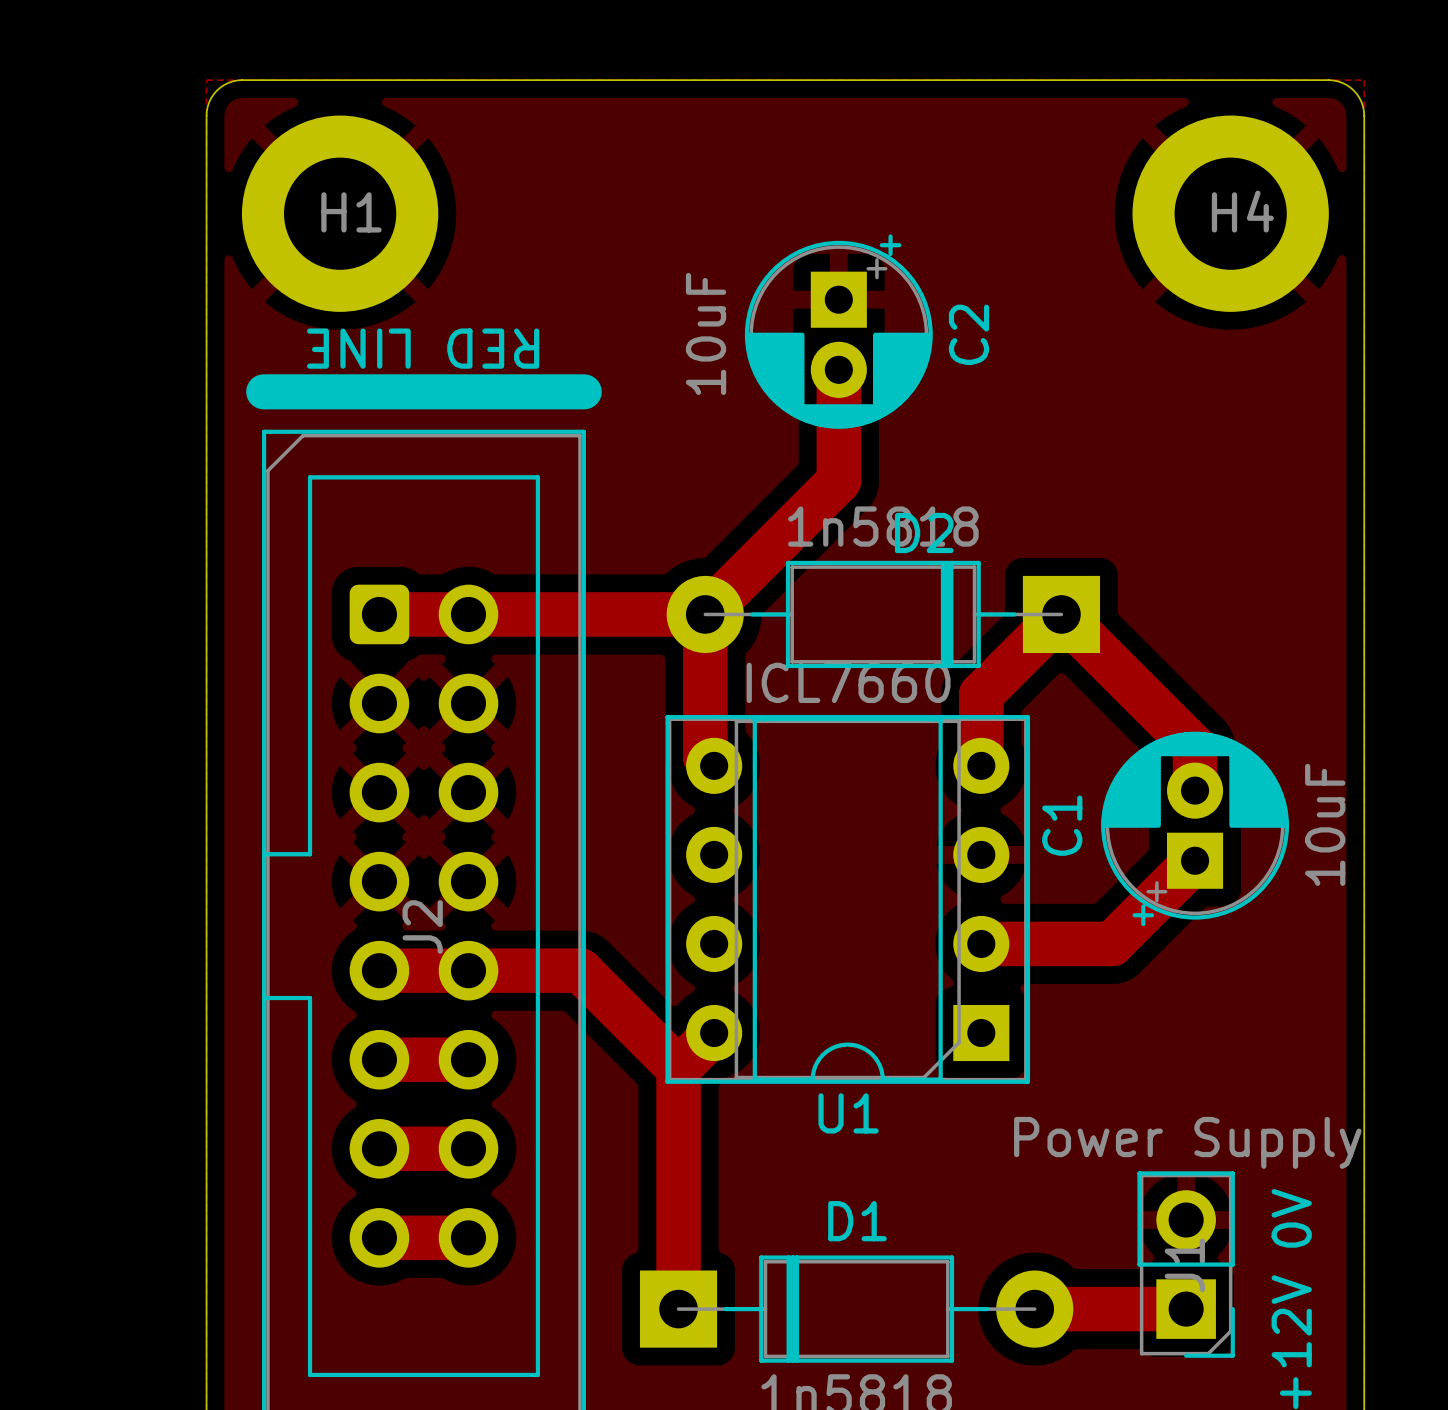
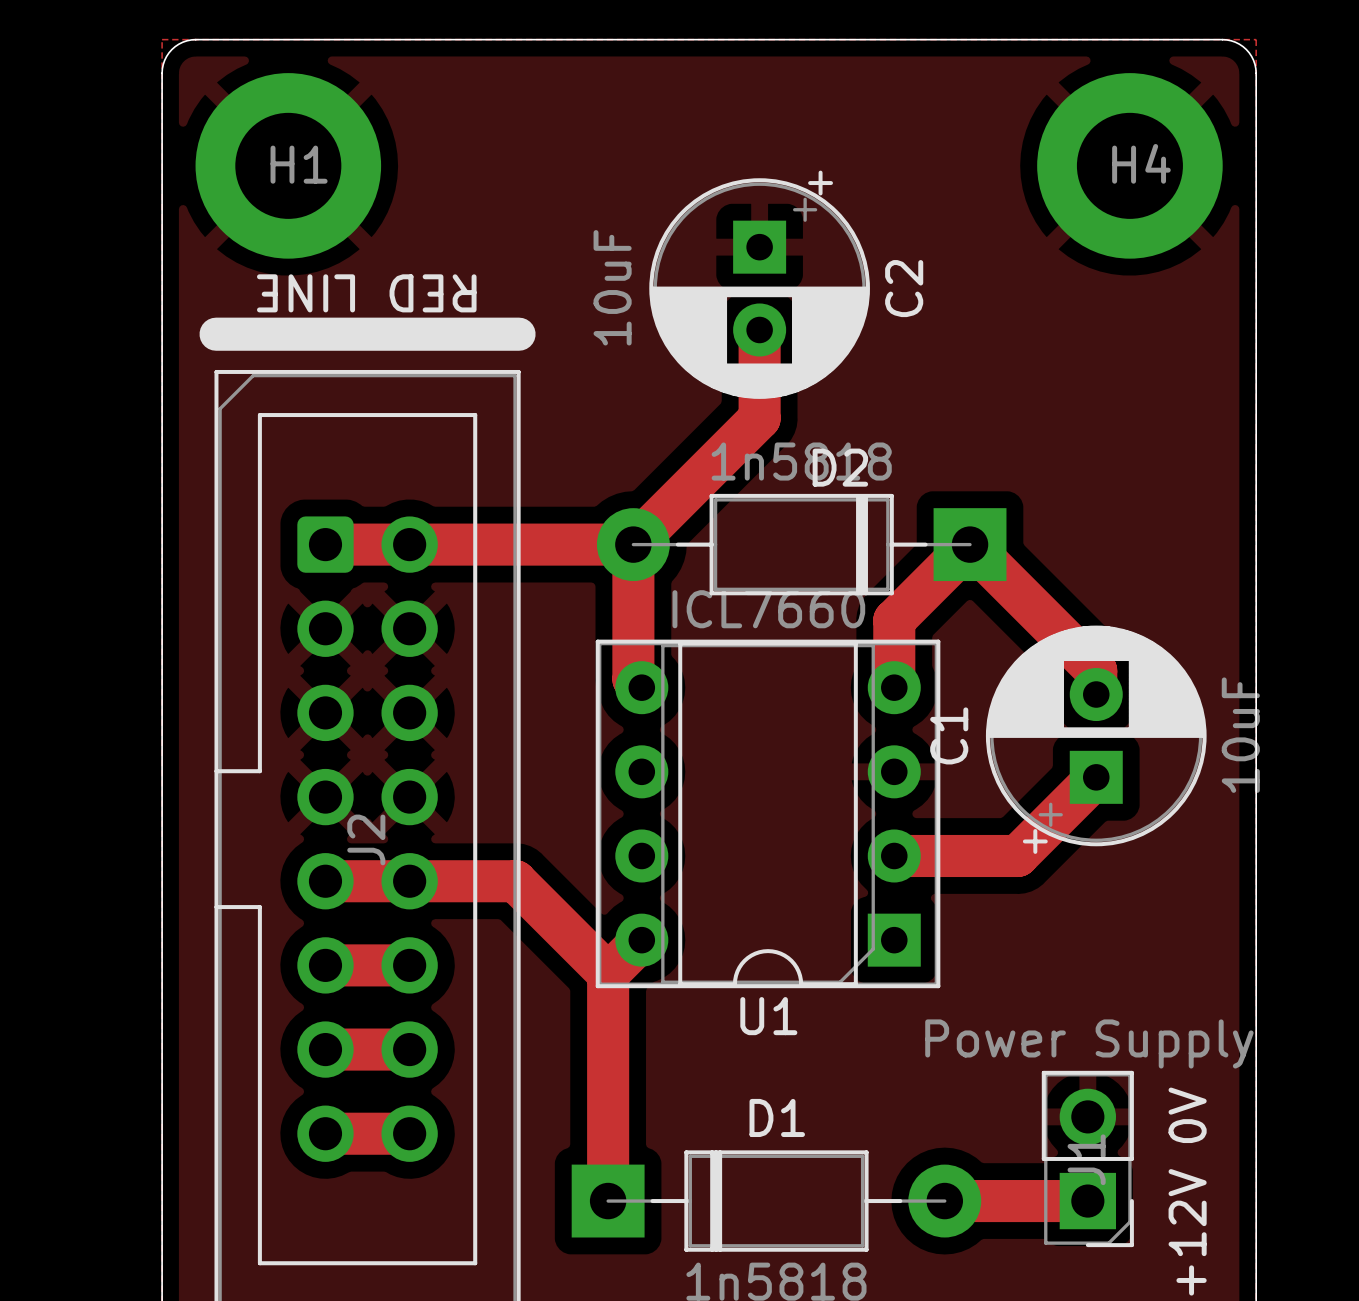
C2 footprint: [744, 234, 933, 429] -> [649, 170, 870, 399]
C1 footprint: [1101, 731, 1290, 927] -> [985, 625, 1207, 854]

